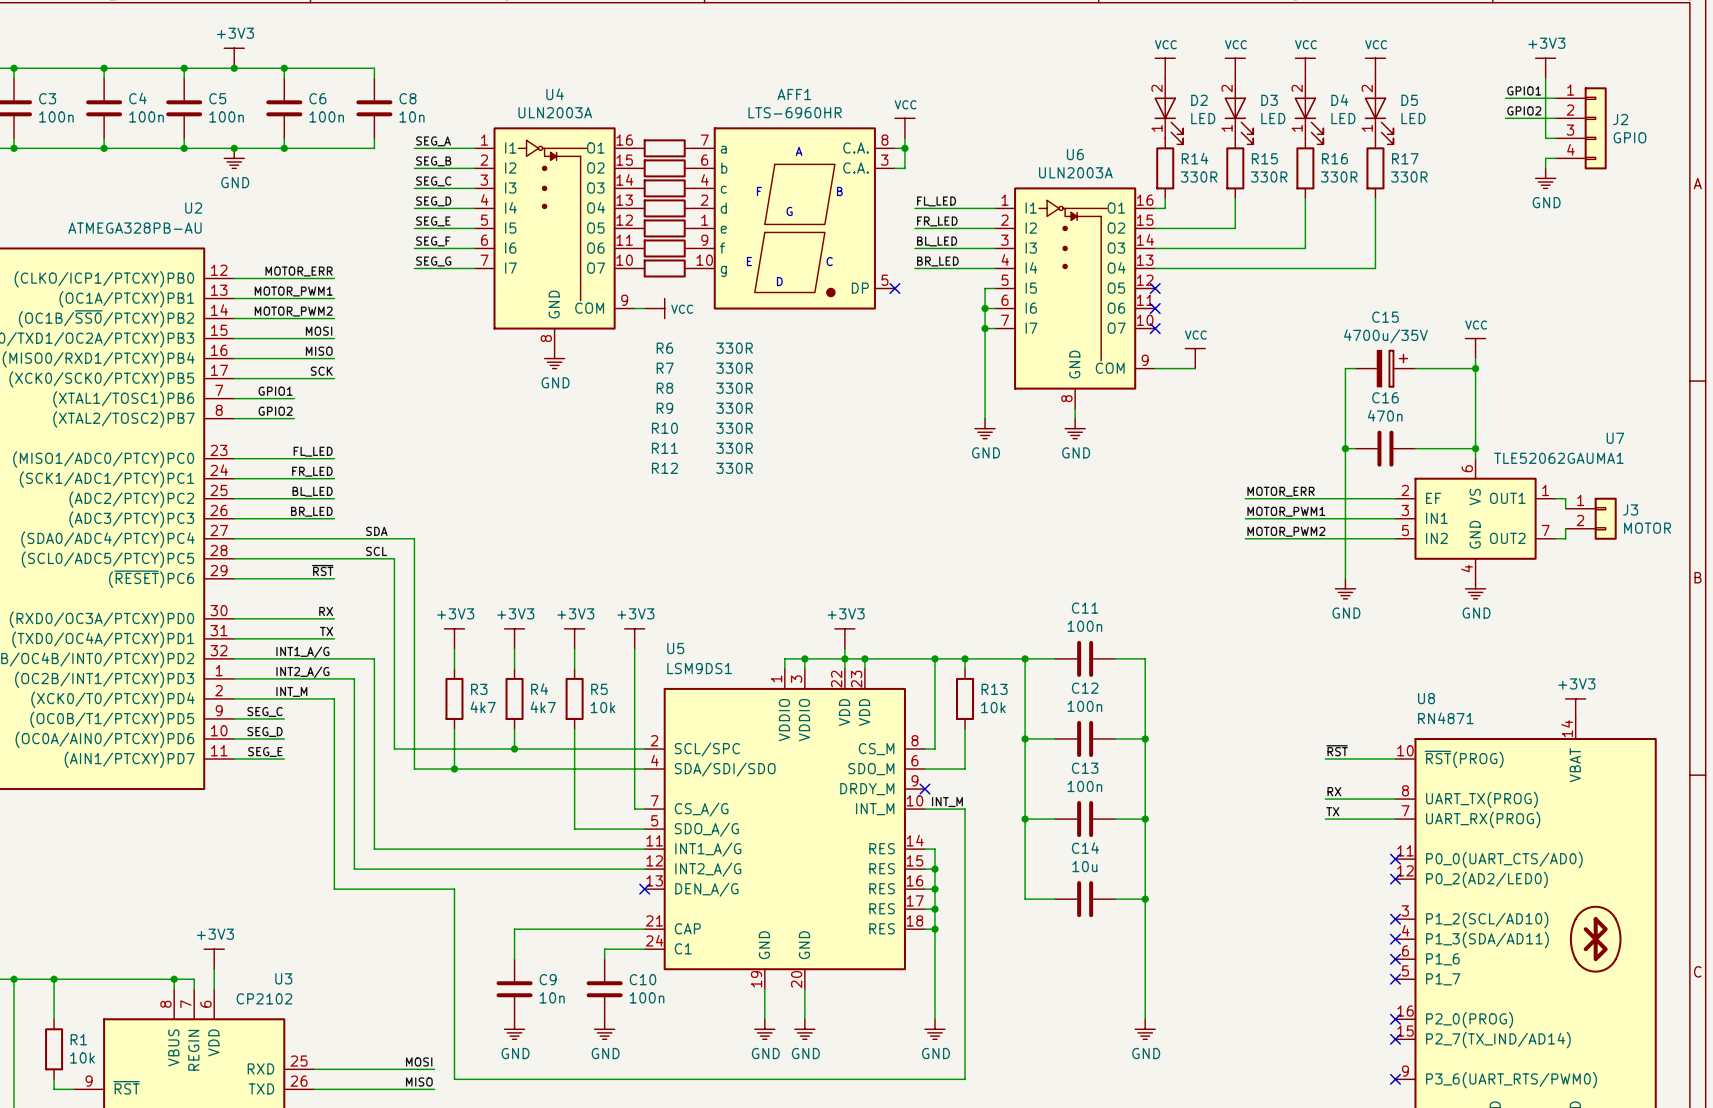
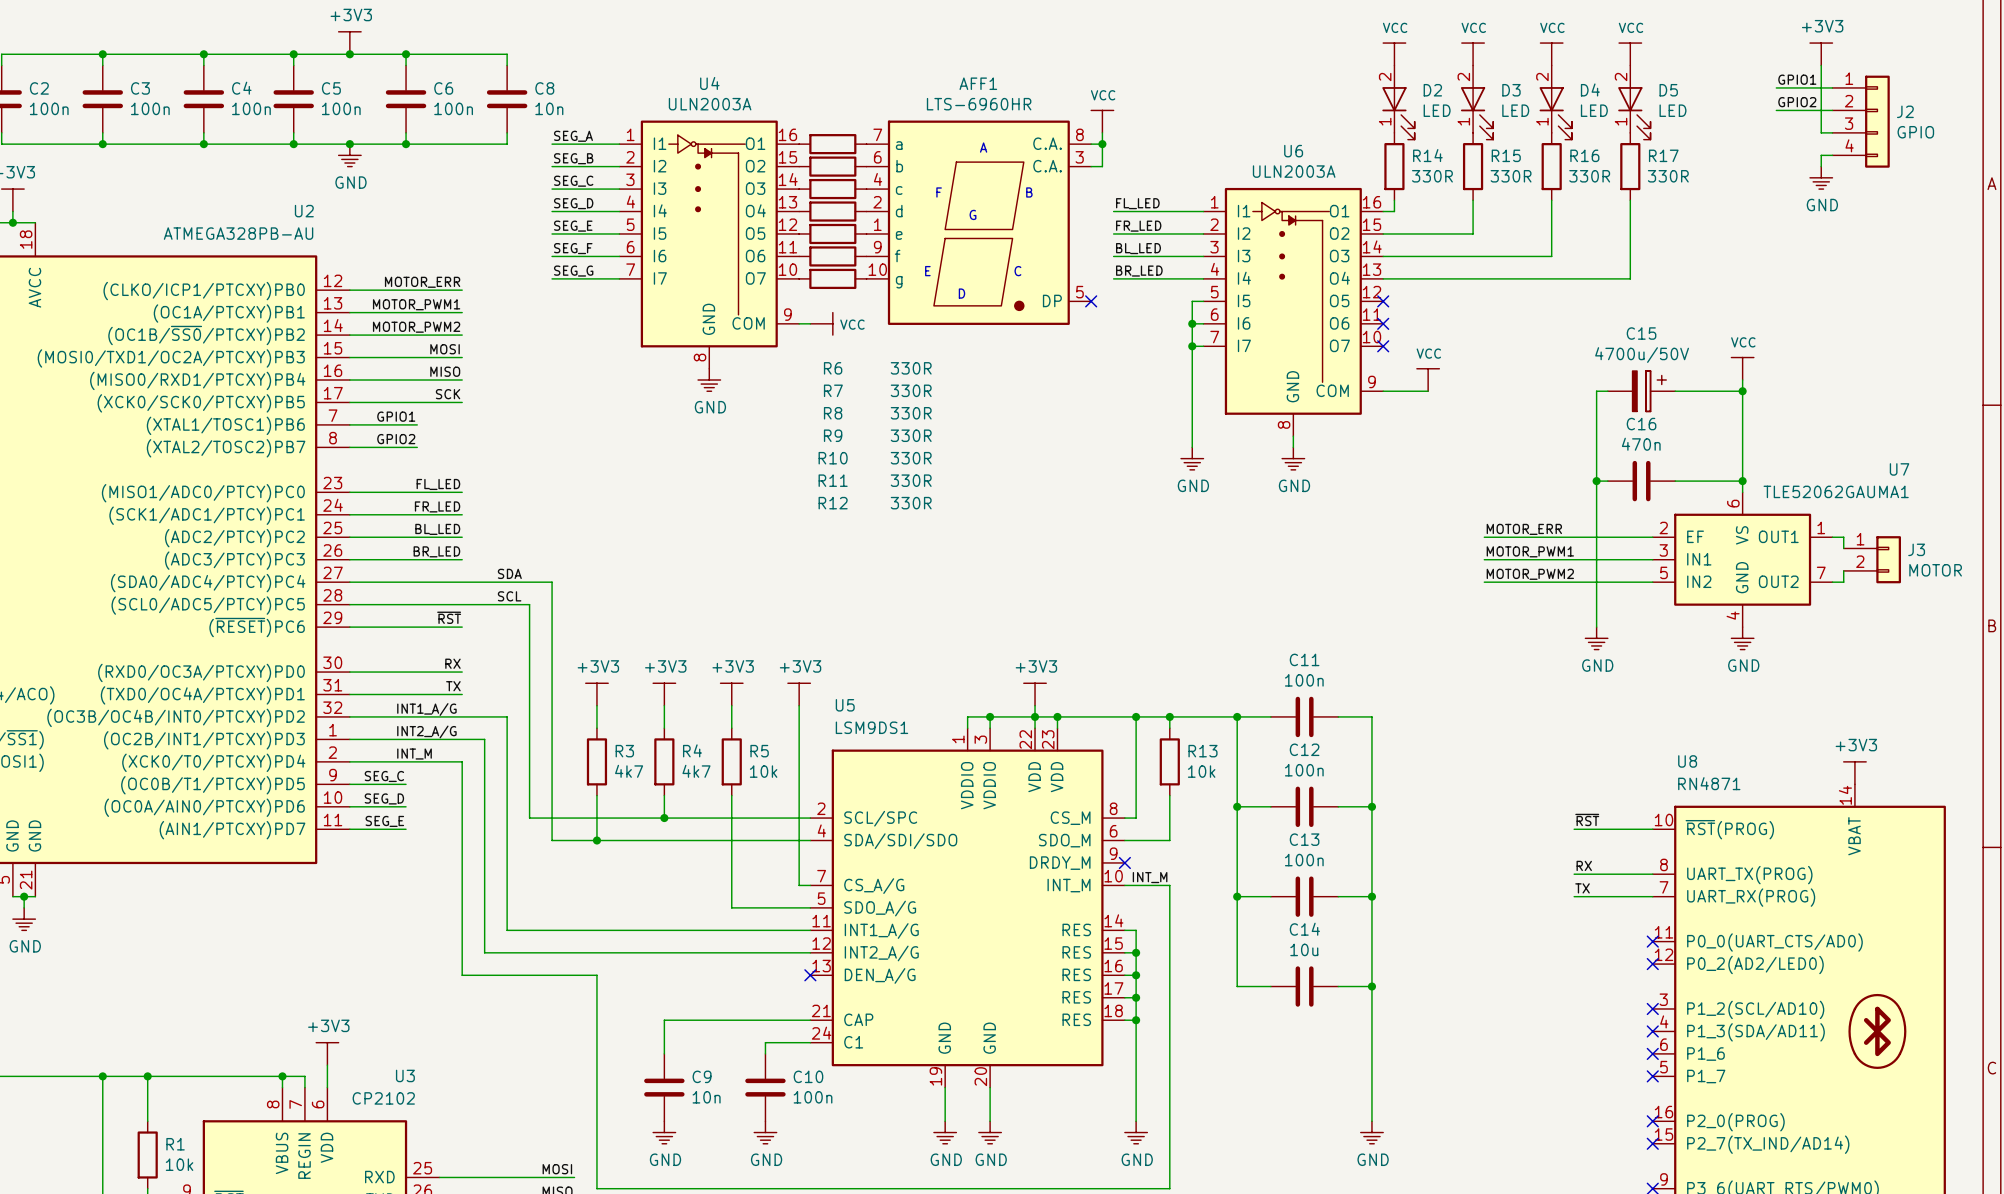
C15 value: 4700u/35V (1385, 336) -> 4700u/50V (1642, 355)

